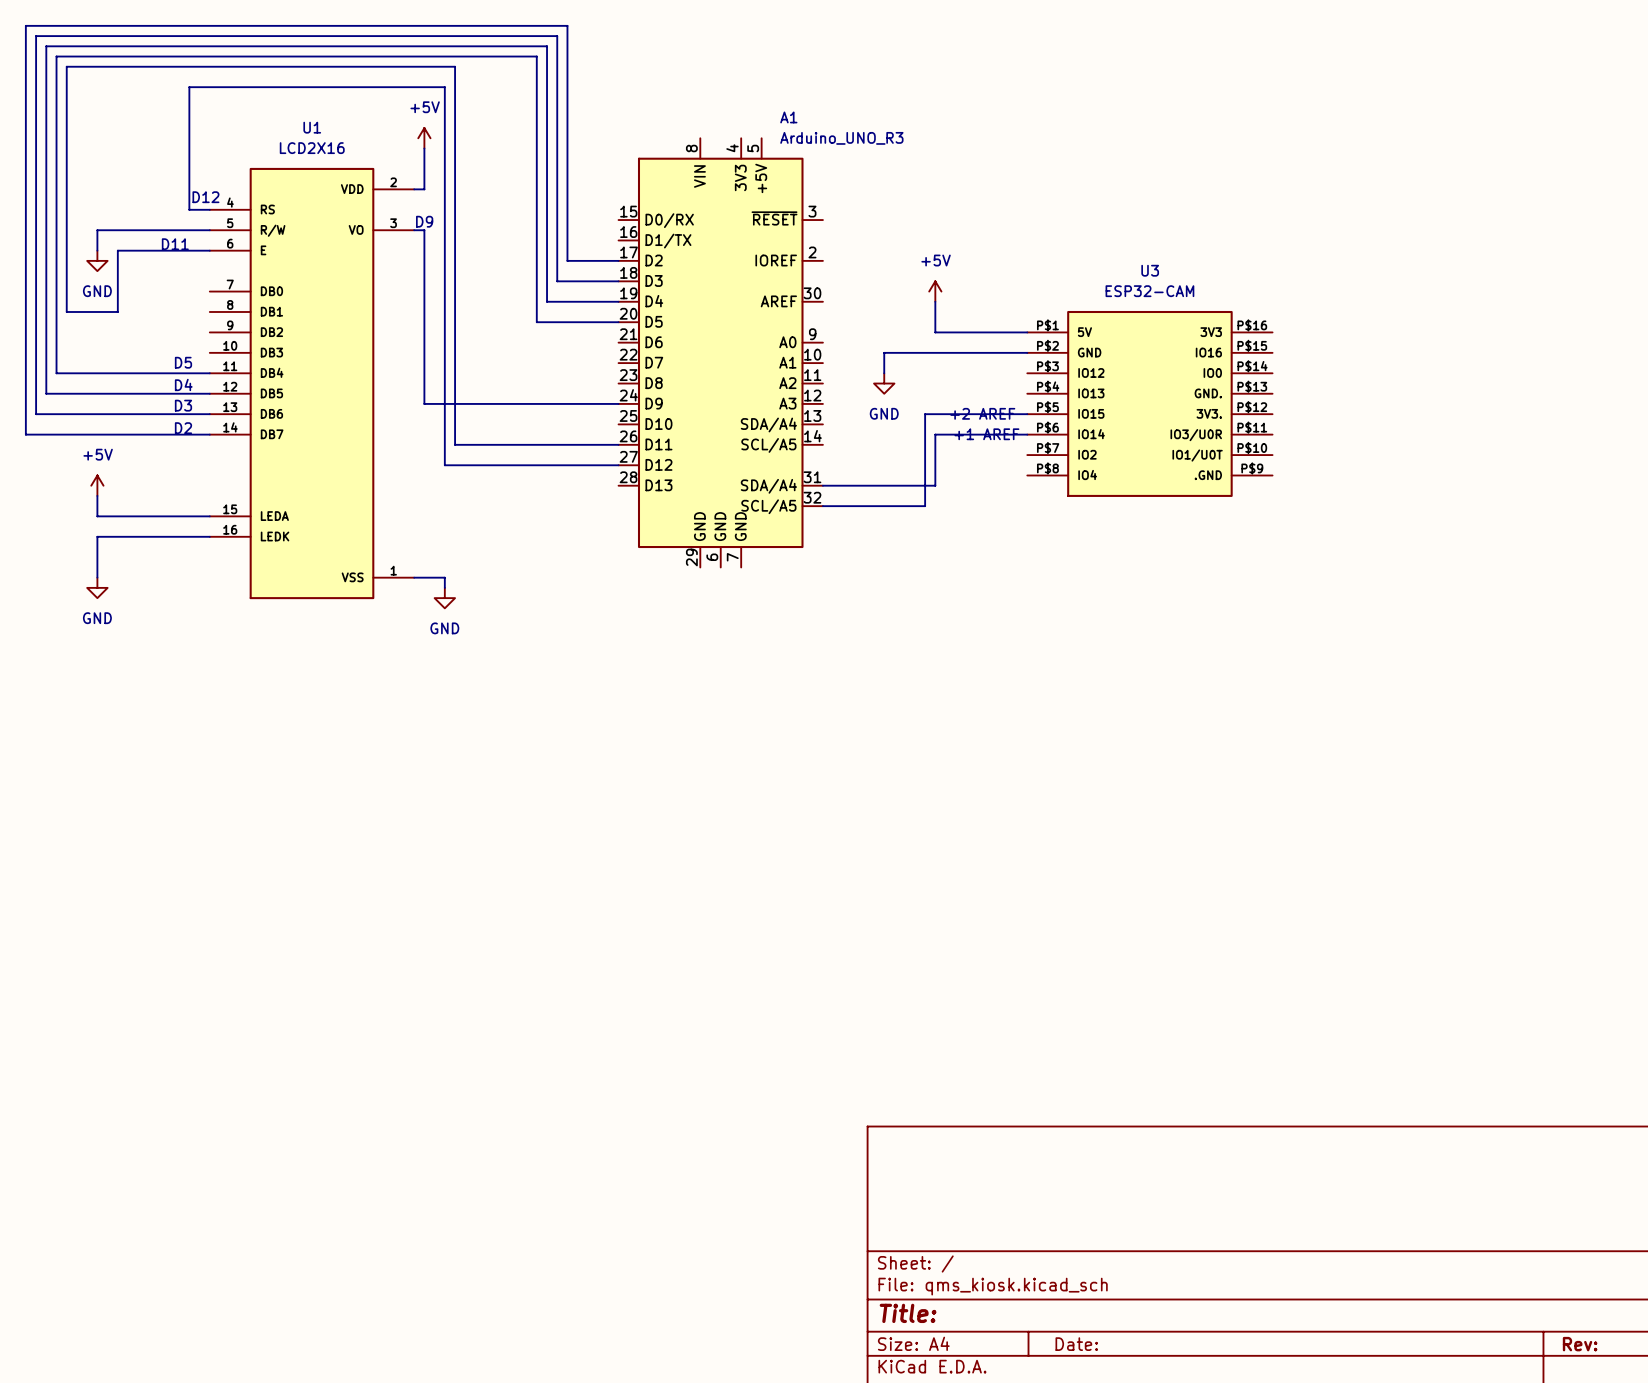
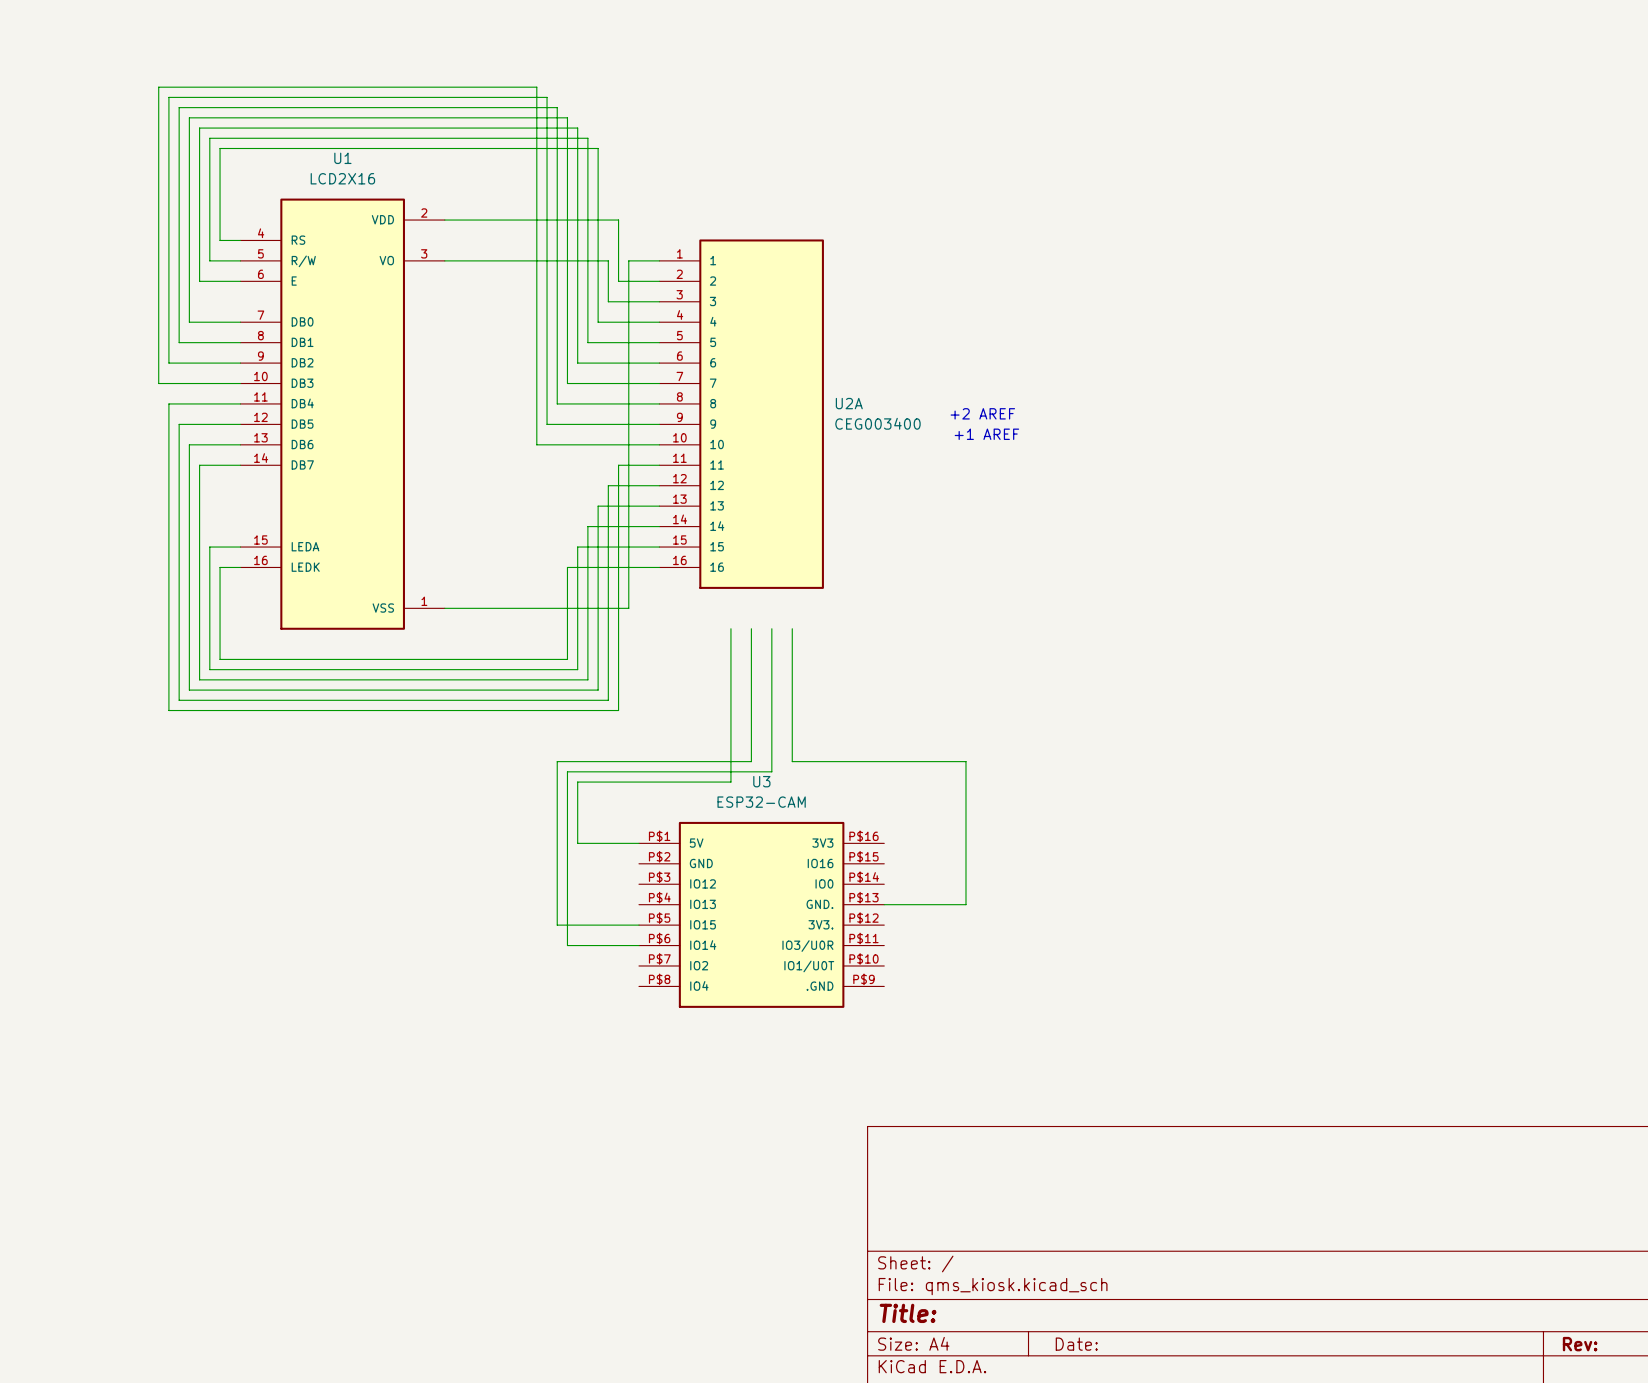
wire: (189, 87) (189, 117) -> (189, 87) (158, 87) (158, 383) (240, 383)
wire: (444, 87) (444, 465) (618, 465) -> none
wire: (536, 87) (536, 56) (56, 56) (56, 373) (209, 373) -> (536, 87) (444, 87)
wire: (547, 97) (547, 46) (46, 46) (46, 393) (209, 393) -> (547, 97) (168, 97) (168, 363) (240, 363)
wire: (557, 107) (557, 36) (36, 36) (36, 414) (209, 414) -> (557, 107) (179, 107) (179, 342) (240, 342)
wire: (567, 117) (567, 25) (25, 25) (25, 434) (209, 434) -> (567, 117) (189, 117)
power symbol: +5V (424, 138) -> none
wire: (424, 148) (424, 189) (414, 189) -> none
text: D12 (205, 197) -> none
wire: (189, 209) (209, 209) -> (189, 209) (189, 322) (240, 322)
wire: none -> (444, 220) (618, 220) (618, 281) (659, 281)
text: D9 (424, 221) -> none
wire: (209, 230) (97, 230) (97, 250) -> none
wire: (414, 230) (424, 230) (424, 403) (557, 403) -> none
wire: none -> (240, 240) (220, 240) (220, 148) (598, 148) (598, 322)
text: D11 (175, 244) -> none
wire: (209, 250) (117, 250) (117, 311) (66, 311) (66, 66) (455, 66) (455, 444) (536, 444) -> none
power symbol: GND (97, 260) -> none
wire: none -> (240, 260) (209, 260) (209, 138) (587, 138) (587, 342) (659, 342)
wire: none -> (444, 260) (567, 260) (567, 383) (659, 383)
wire: (608, 260) (618, 260) -> (608, 260) (608, 301)
wire: none -> (659, 260) (628, 260) (628, 608) (444, 608)
wire: none -> (240, 281) (199, 281) (199, 128) (577, 128) (577, 363) (659, 363)
wire: (557, 281) (618, 281) -> (557, 281) (557, 403)
power symbol: +5V (935, 291) -> none
wire: (547, 301) (608, 301) -> (547, 301) (547, 424) (659, 424)
wire: (935, 301) (935, 332) (1027, 332) -> none
wire: (536, 322) (598, 322) -> (536, 322) (536, 444)
A1: Arduino_UNO_R3 (720, 352) -> none
wire: (1027, 352) (884, 352) (884, 373) -> none
text: D5 (183, 362) -> none
U1 position: (311, 383) -> (342, 414)
power symbol: GND (884, 383) -> none
text: D4 (183, 384) -> none
wire: none -> (240, 403) (168, 403) (168, 710) (618, 710) (618, 465) (659, 465)
U3 position: (1149, 403) -> (761, 914)
text: D3 (183, 405) -> none
U2A: none -> CEG003400 (741, 414)
wire: (1027, 414) (925, 414) (925, 506) (822, 506) -> none
wire: none -> (240, 424) (179, 424) (179, 700) (608, 700) (608, 485) (659, 485)
text: D2 (183, 428) -> none
wire: (1027, 434) (935, 434) (935, 485) (822, 485) -> none
wire: none -> (240, 444) (189, 444) (189, 690) (598, 690) (598, 506) (659, 506)
wire: none -> (240, 465) (199, 465) (199, 679) (587, 679) (587, 526) (659, 526)
power symbol: +5V (97, 485) -> none
wire: (97, 495) (97, 516) (209, 516) -> none
wire: (209, 536) (97, 536) (97, 577) -> none
wire: none -> (240, 547) (209, 547) (209, 669) (577, 669) (577, 547) (659, 547)
wire: none -> (240, 567) (220, 567) (220, 659) (567, 659) (567, 567) (659, 567)
wire: (414, 577) (444, 577) (444, 587) -> none
power symbol: GND (97, 587) -> none
power symbol: GND (444, 598) -> none
wire: none -> (730, 628) (730, 782) (577, 782) (577, 843) (638, 843)
wire: none -> (751, 628) (751, 761) (557, 761) (557, 925) (638, 925)
wire: none -> (771, 628) (771, 771) (567, 771) (567, 945) (638, 945)
wire: none -> (792, 628) (792, 761) (965, 761) (965, 904) (884, 904)

